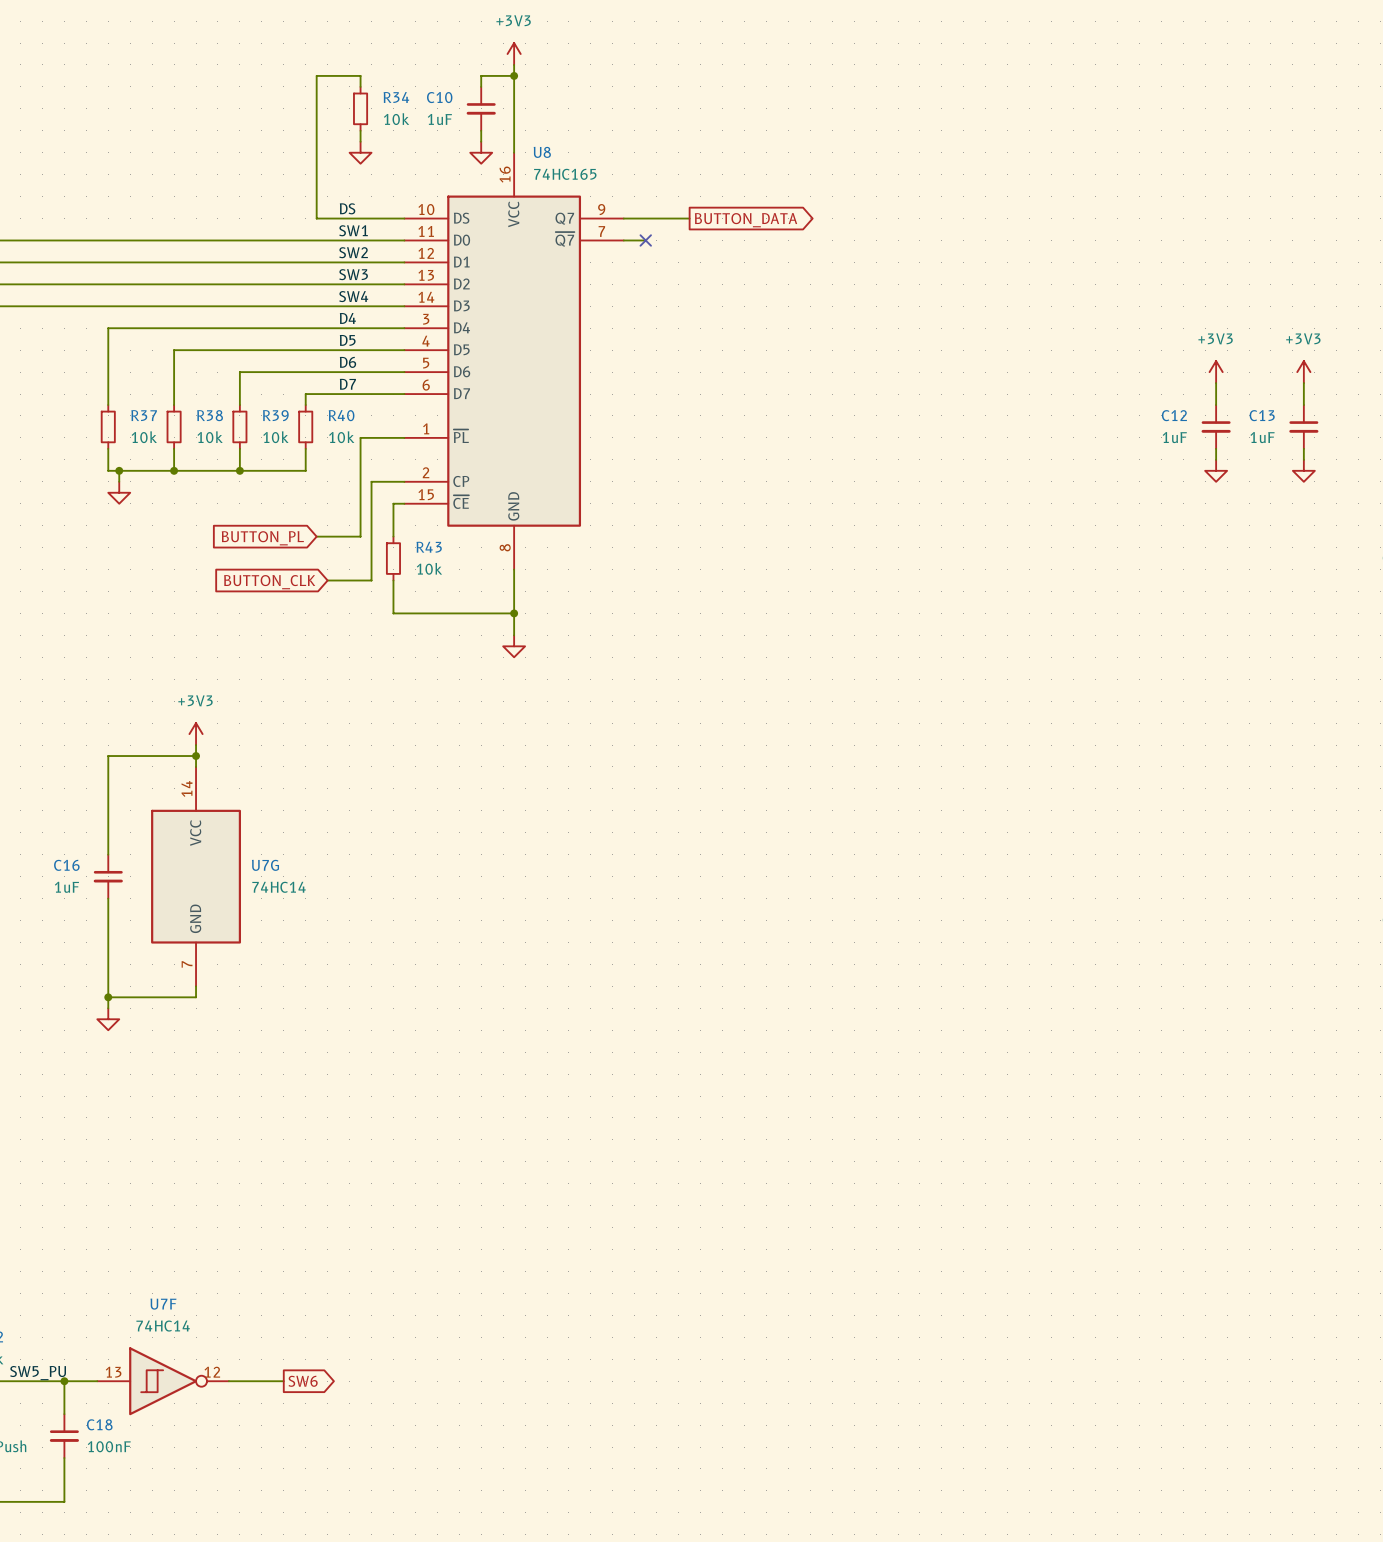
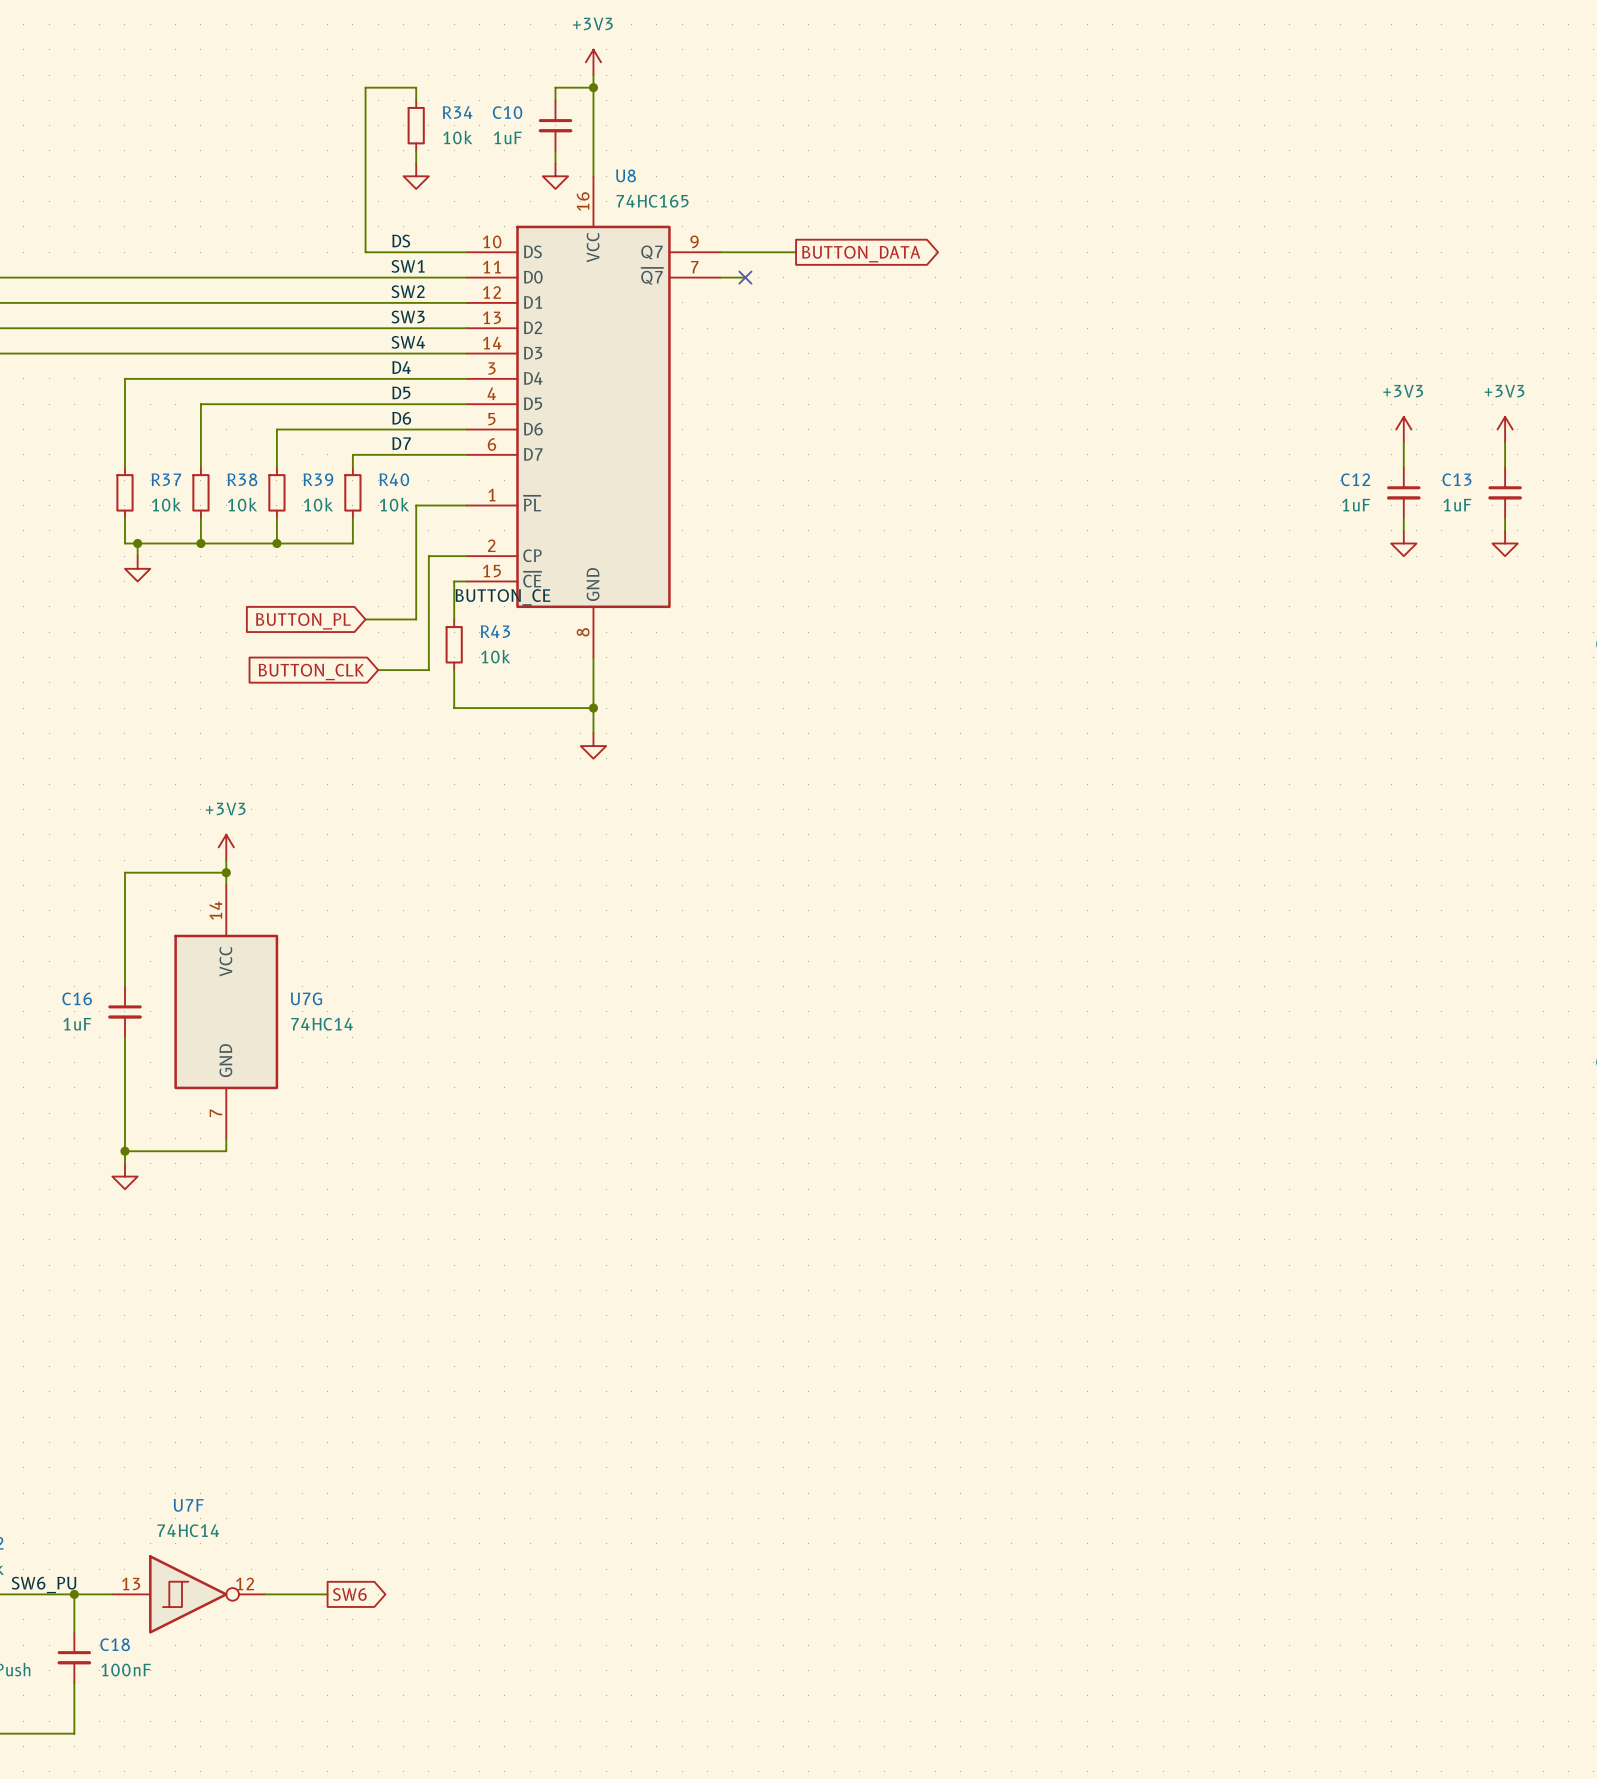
label: none -> BUTTON_CE (502, 597)
label: SW5_PU (38, 1373) -> SW6_PU (43, 1584)

